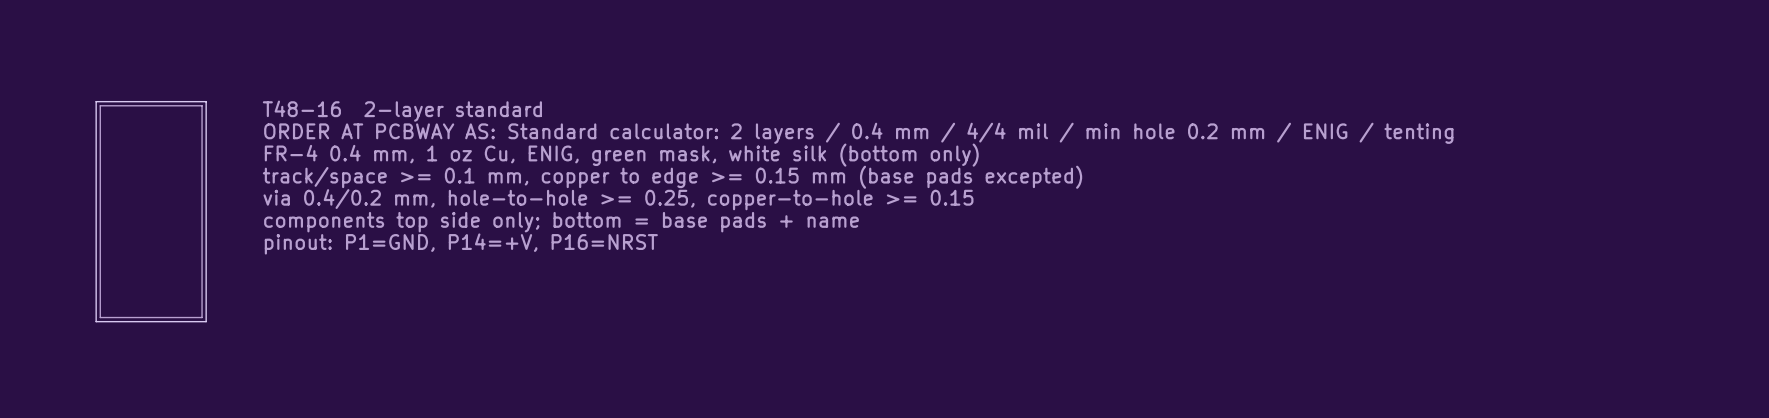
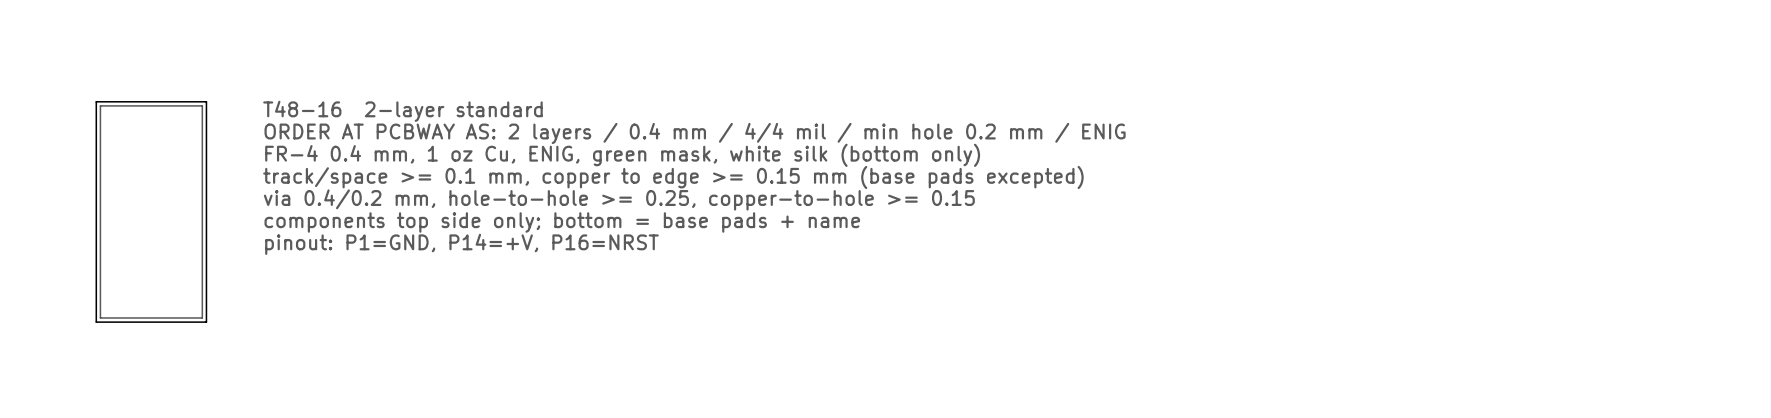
text: ORDER AT PCBWAY AS: Standard calculator: 2 layers / 0.4 mm / 4/4 mil / min hole 0.2 mm / ENIG / tenting (858, 133) -> ORDER AT PCBWAY AS: 2 layers / 0.4 mm / 4/4 mil / min hole 0.2 mm / ENIG (695, 133)

